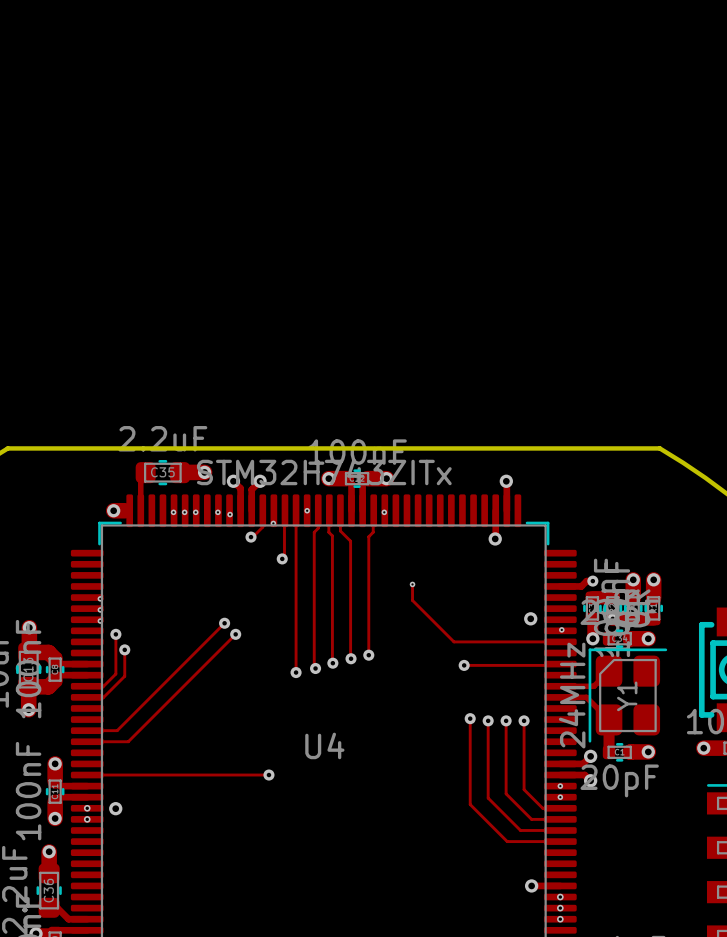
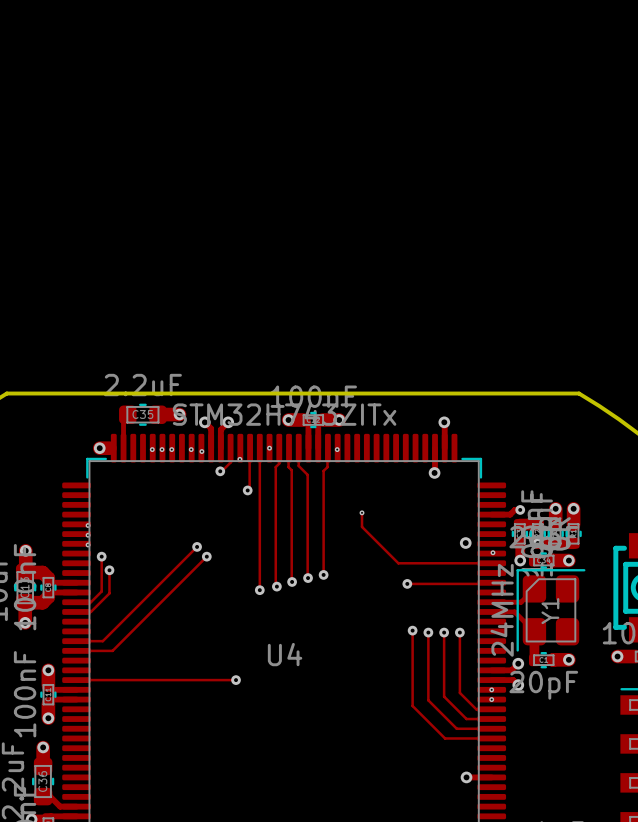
via: (87, 808) -> none
via: (115, 808) -> none
via: (87, 819) -> none
via: (560, 897) -> none
via: (560, 908) -> none
via: (560, 919) -> none

